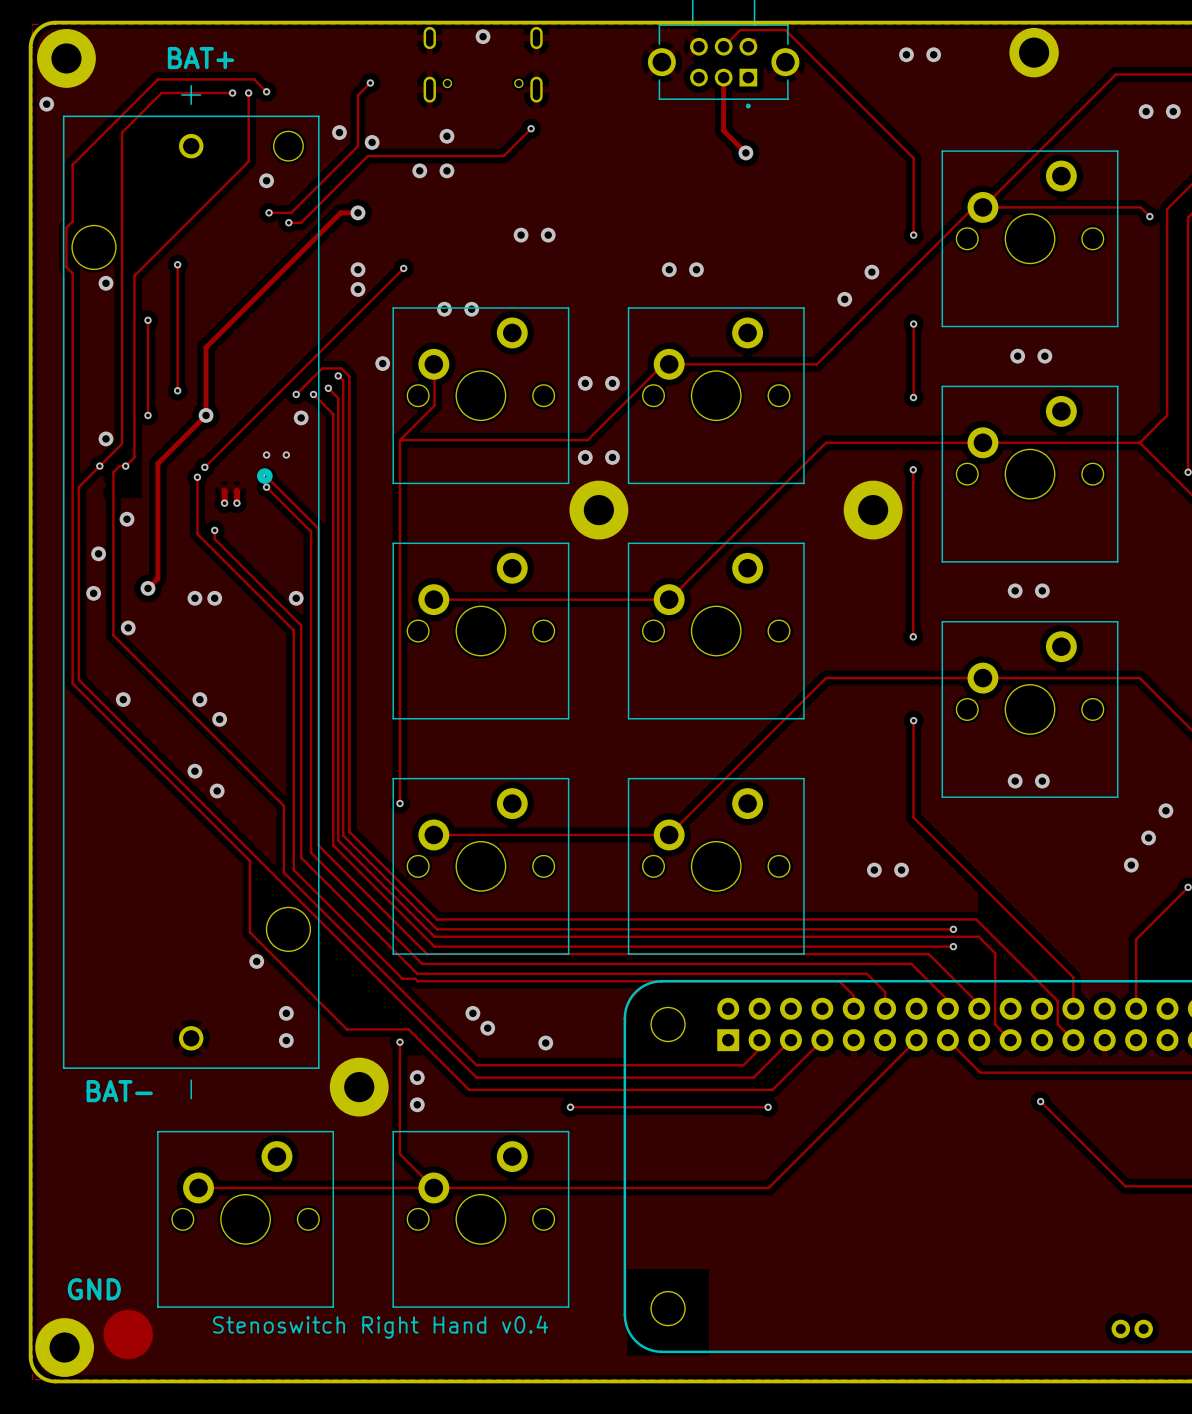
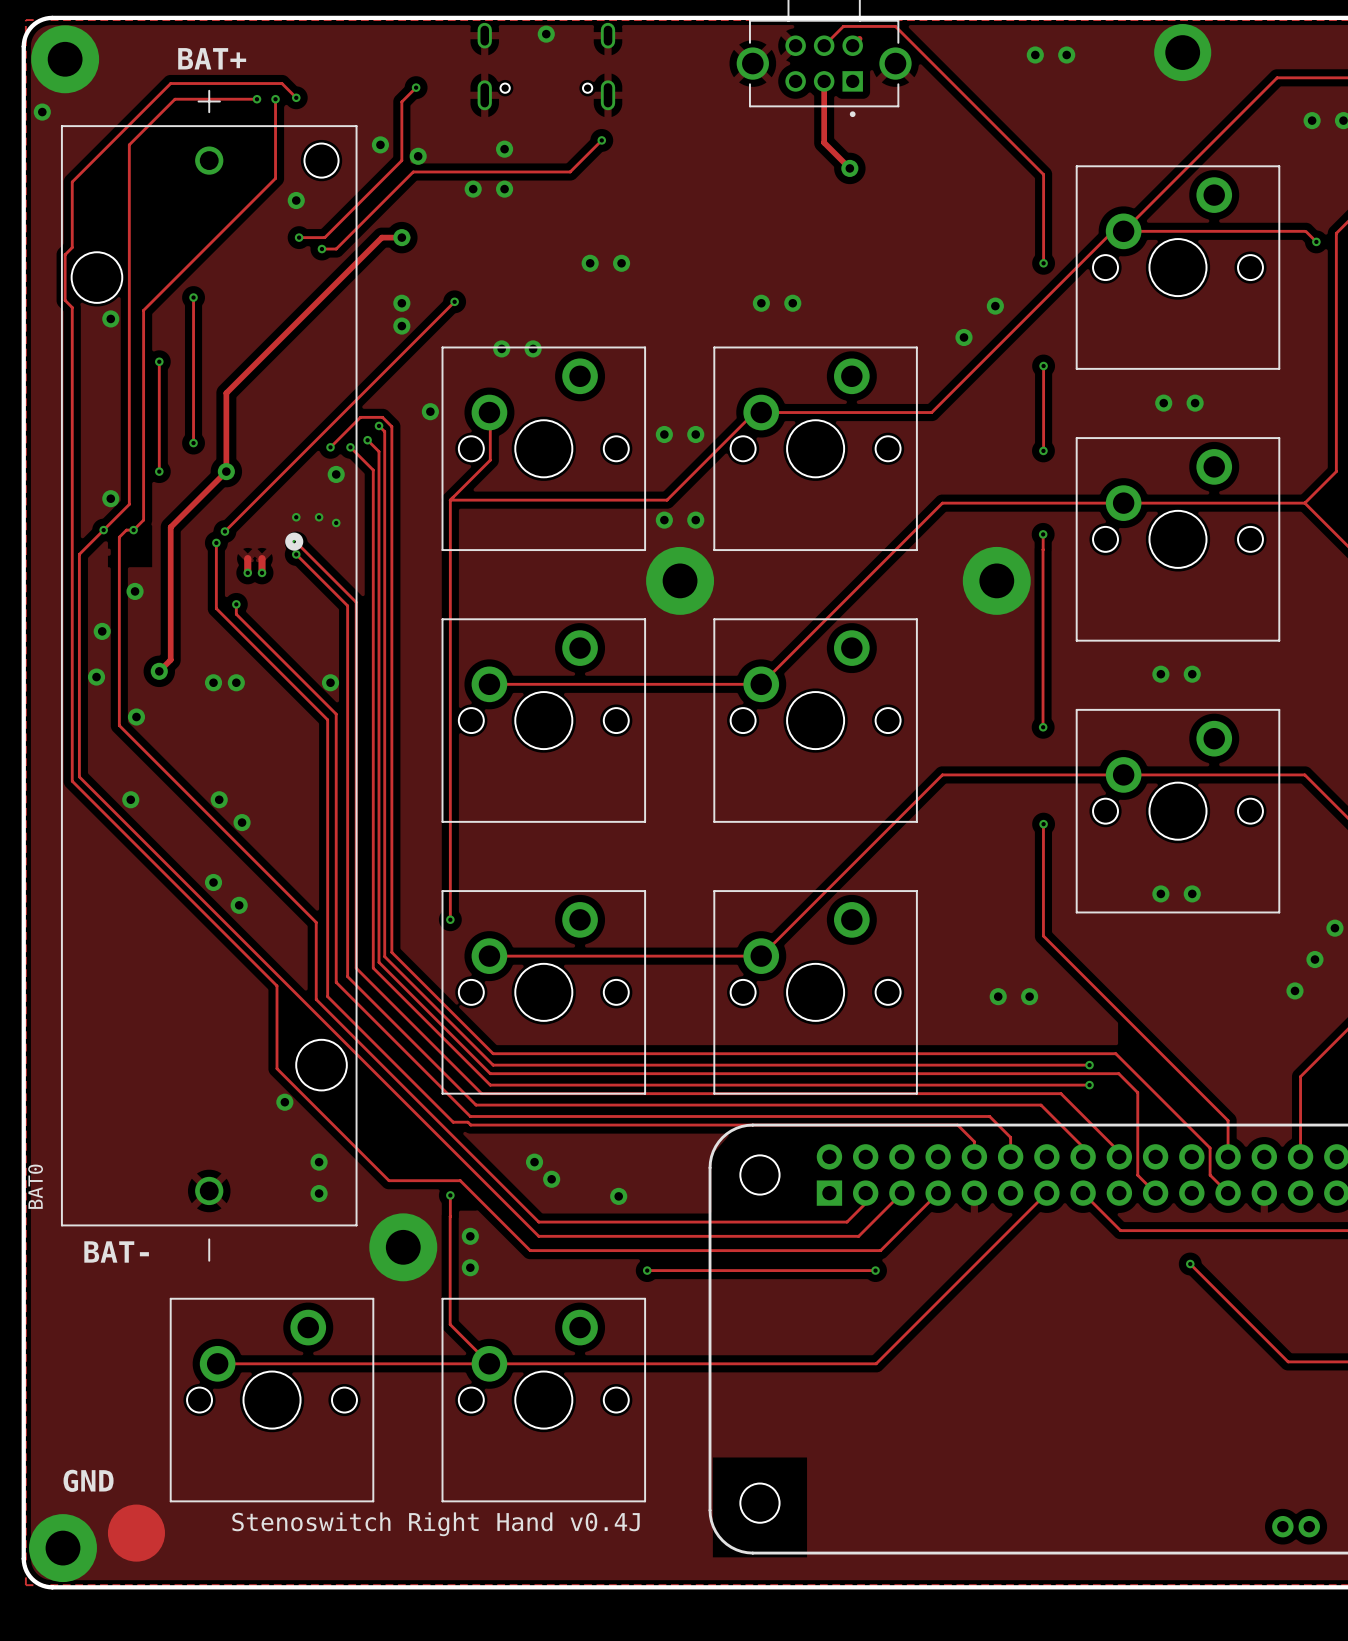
via: none -> (336, 522)
BAT0 name: none -> BAT0 (35, 1186)
text: Stenoswitch Right Hand v0.4 (380, 1327) -> Stenoswitch Right Hand v0.4J (435, 1524)

